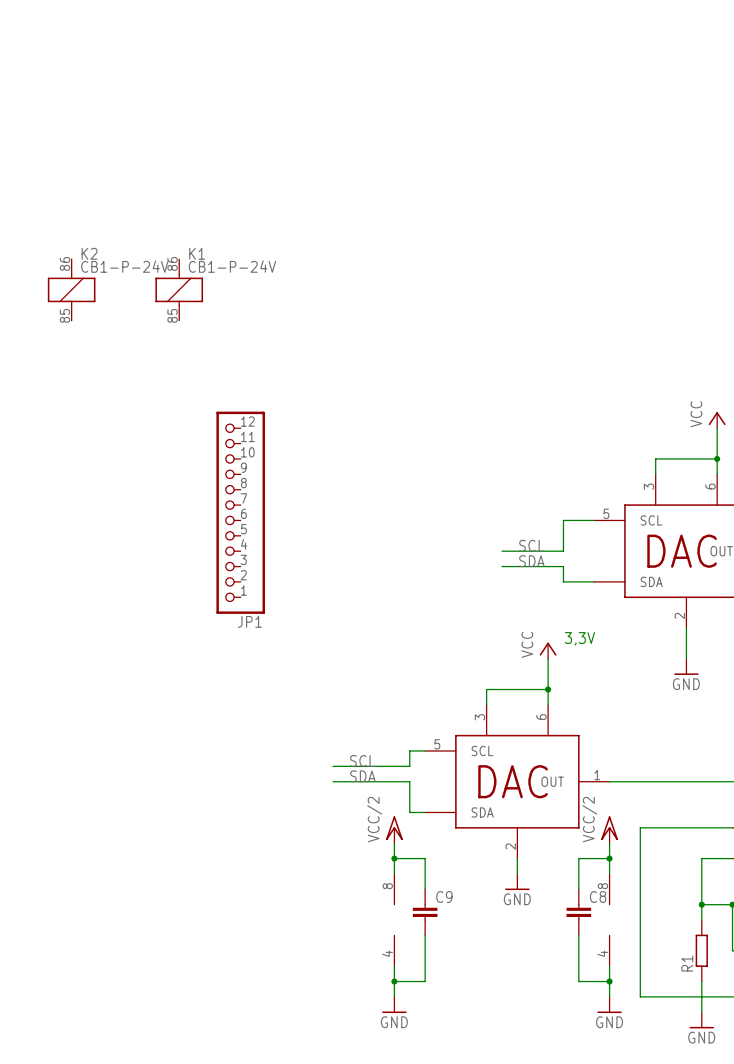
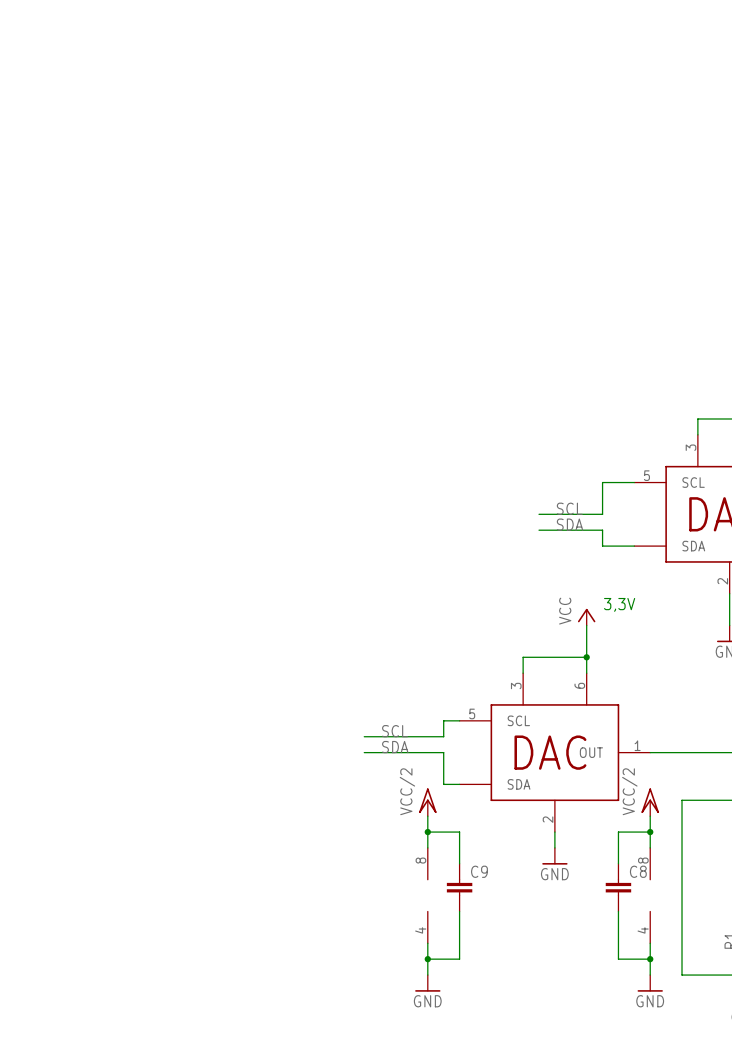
K2: CB1-P-24V (71, 289) -> none
K1: CB1-P-24V (179, 289) -> none
JP1: (240, 512) -> none

